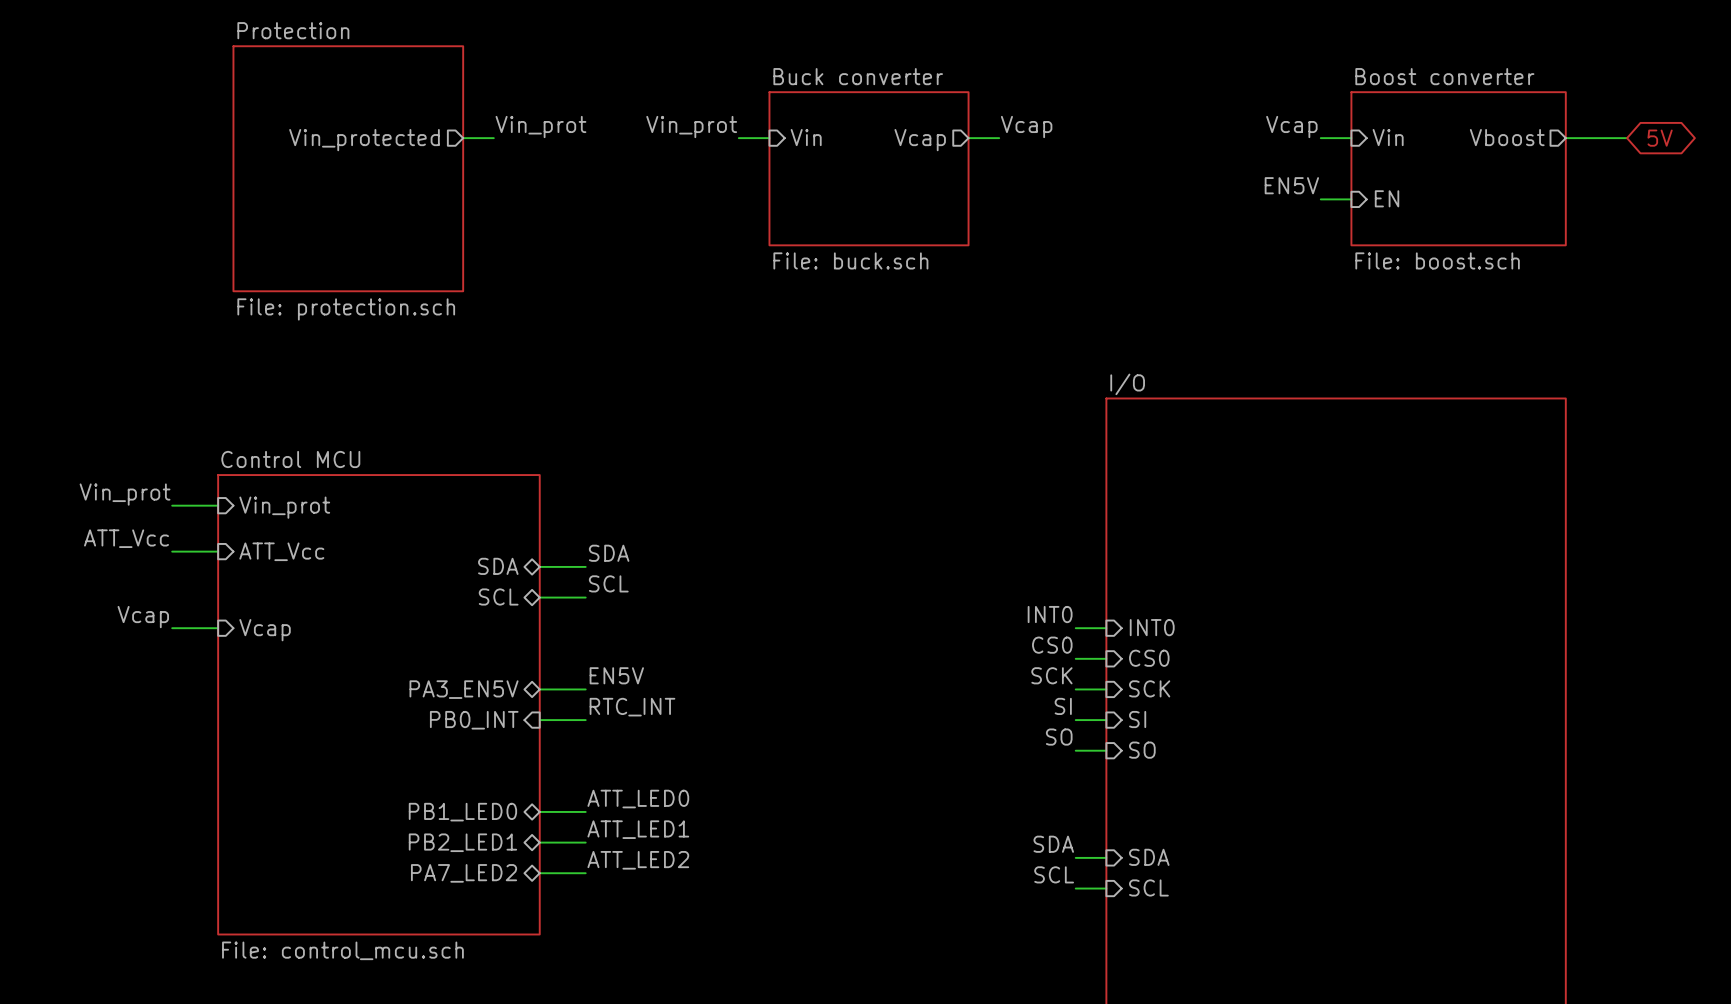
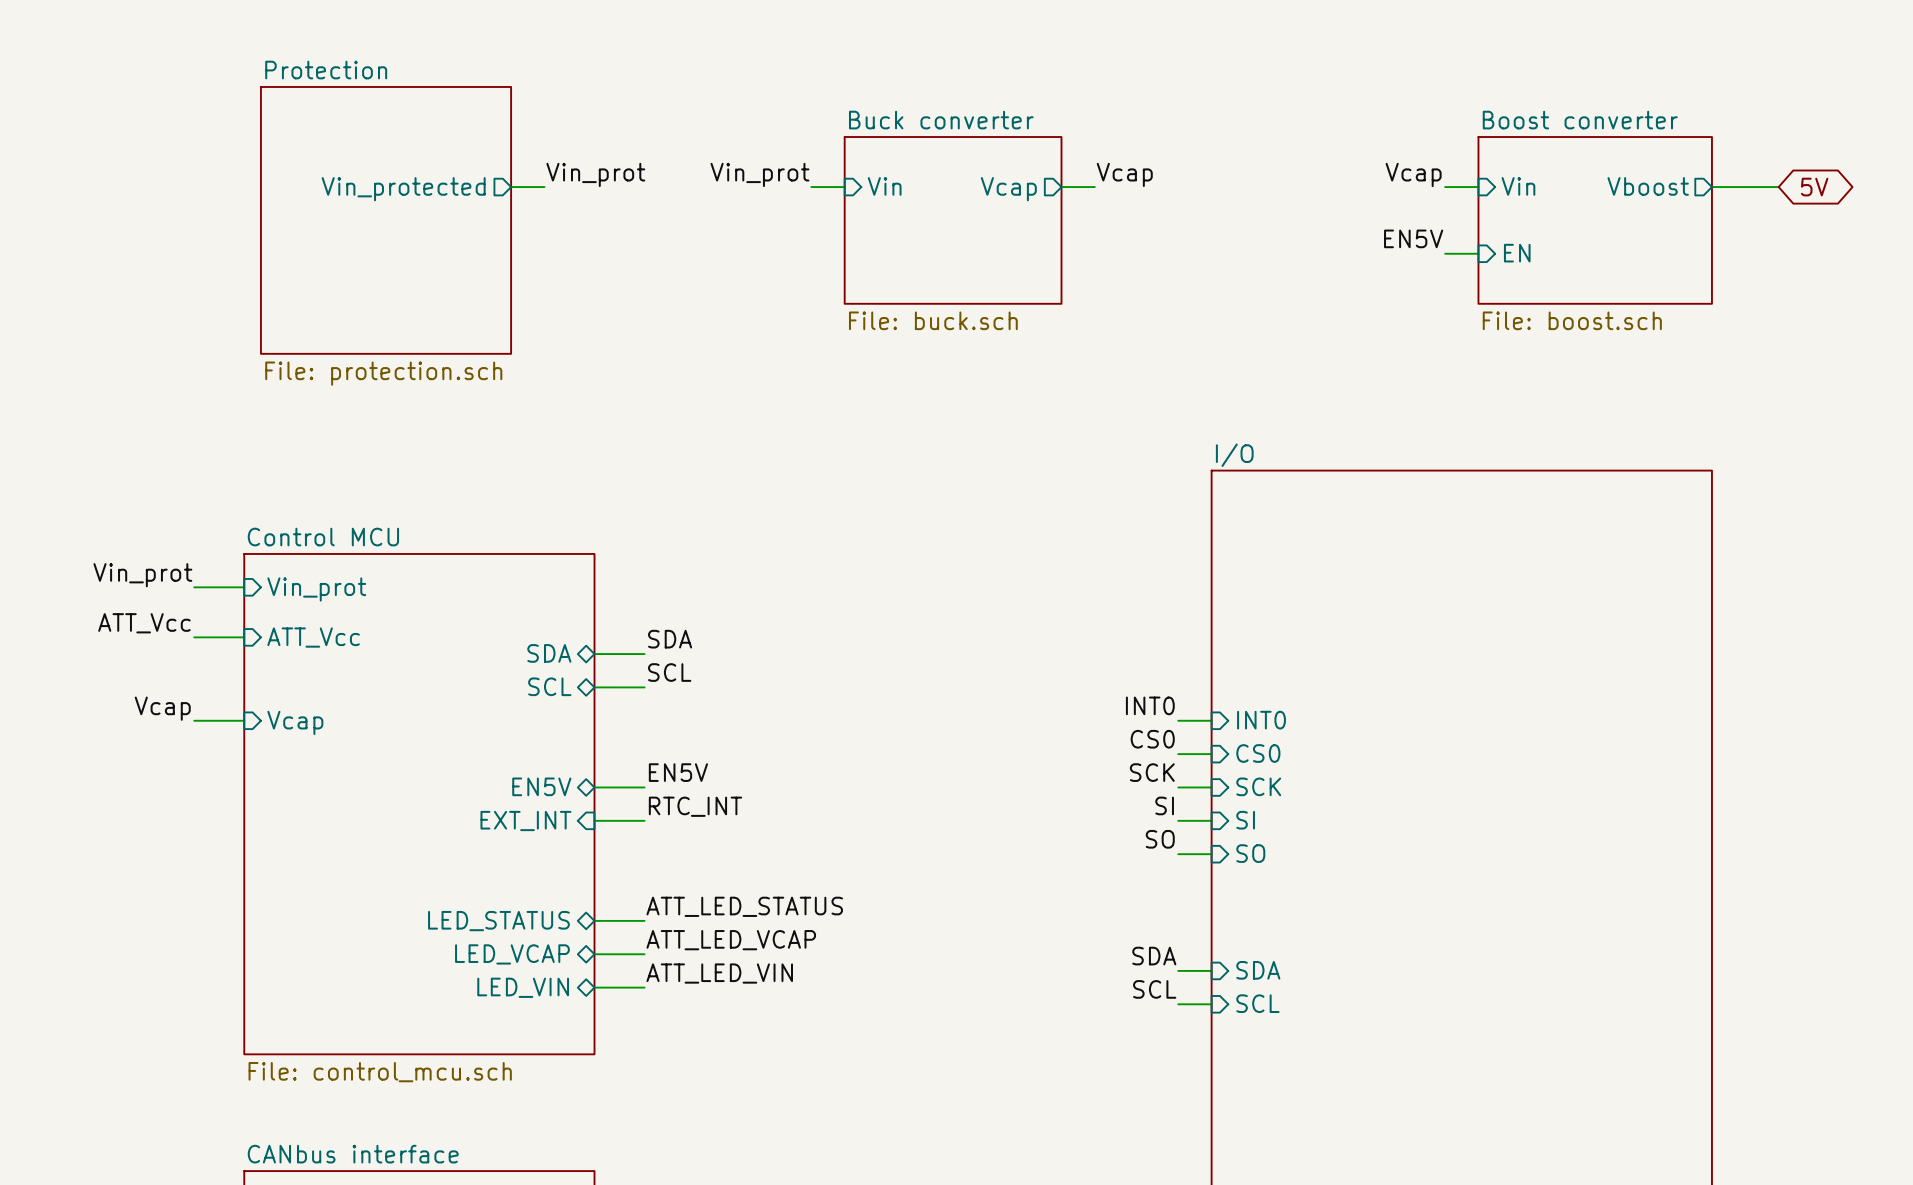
sheet pin: PA3_EN5V (464, 689) -> EN5V (541, 786)
sheet pin: PB0_INT (474, 720) -> EXT_INT (525, 821)
label: ATT_LED0 (638, 799) -> ATT_LED_STATUS (744, 906)
sheet pin: PB1_LED0 (462, 812) -> LED_STATUS (498, 921)
label: ATT_LED1 (638, 829) -> ATT_LED_VCAP (731, 940)
sheet pin: PB2_LED1 (462, 842) -> LED_VCAP (512, 954)
label: ATT_LED2 (638, 860) -> ATT_LED_VIN (719, 973)
sheet pin: PA7_LED2 (464, 873) -> LED_VIN (523, 987)

